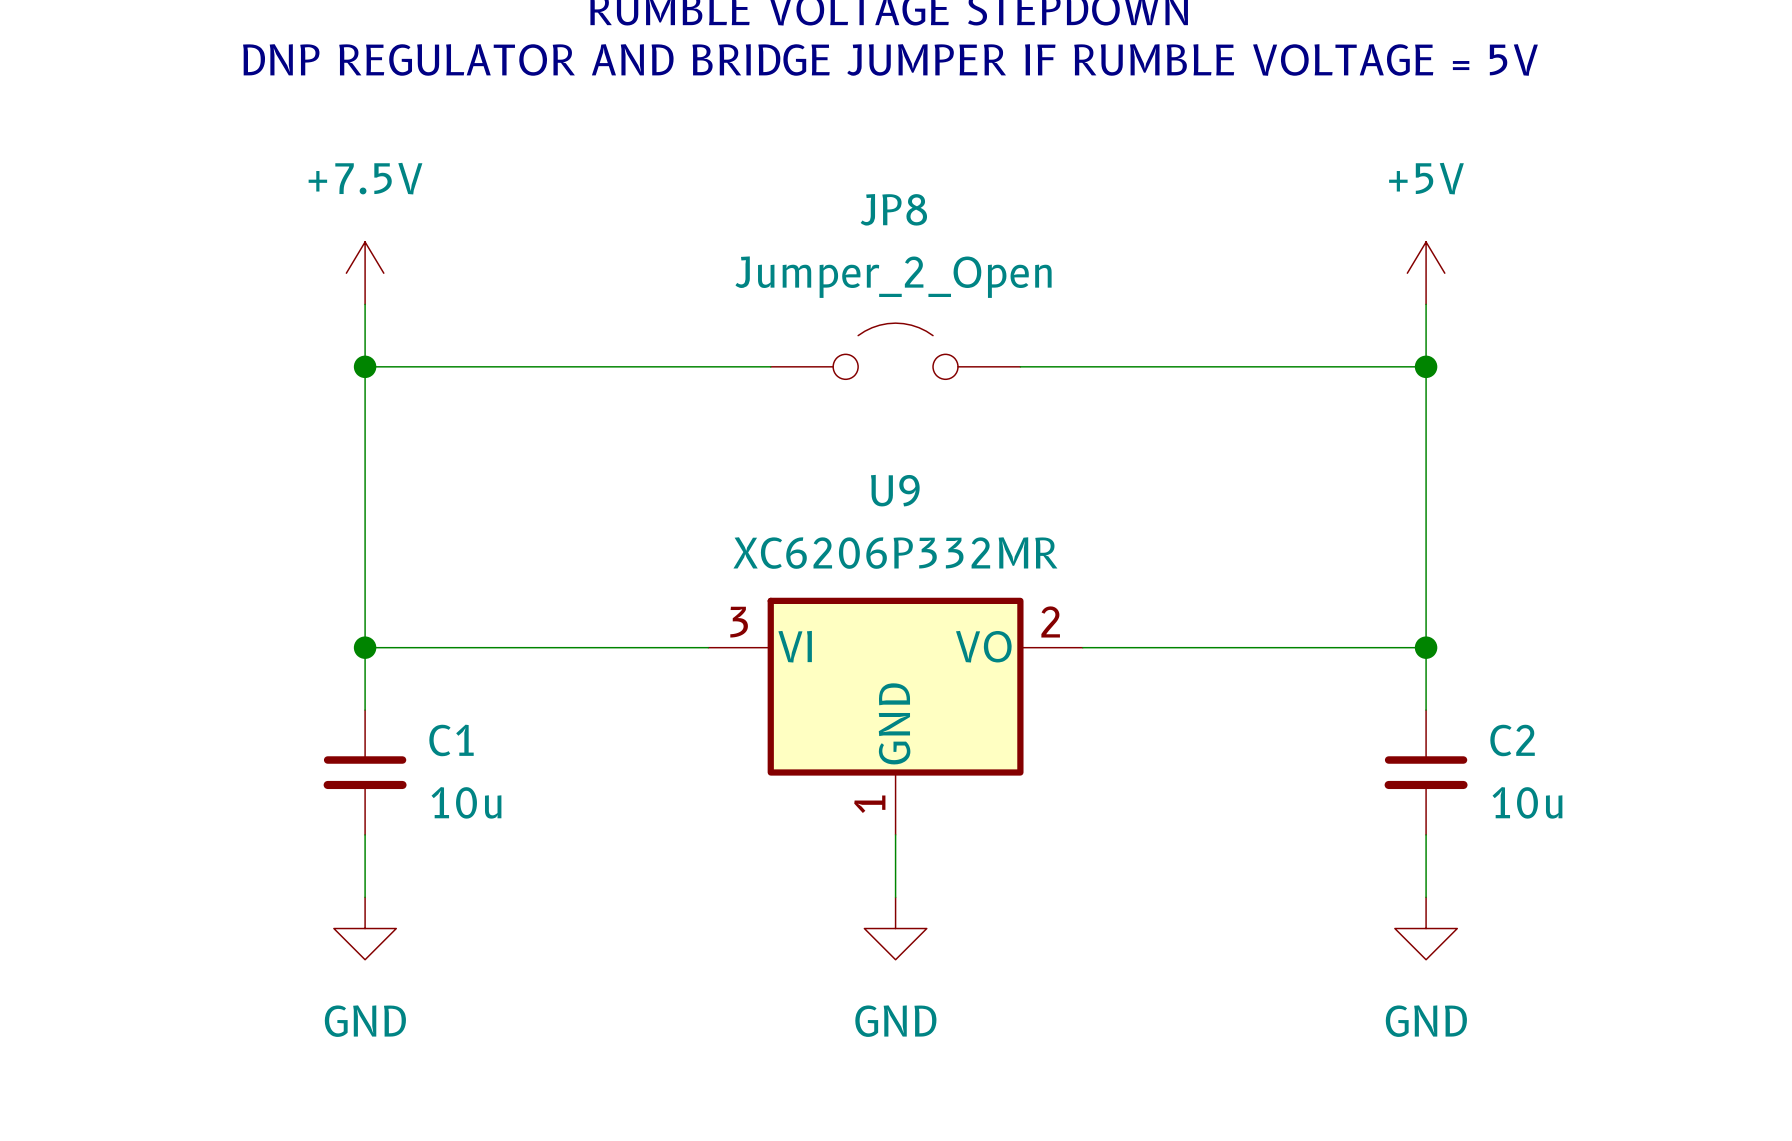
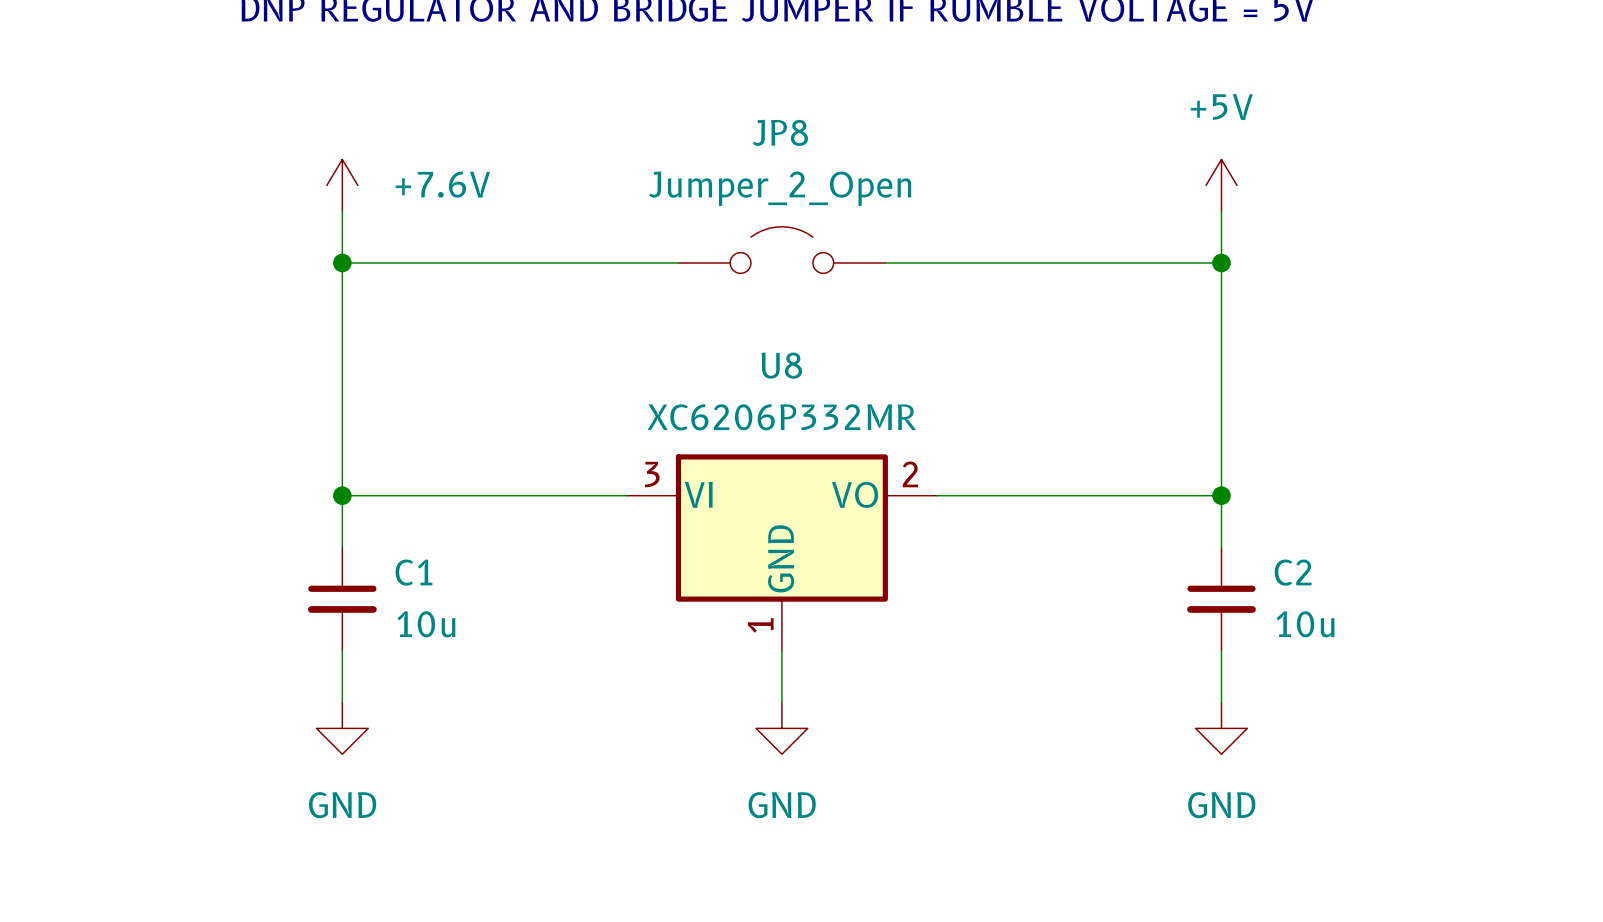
power symbol: +7.5V (365, 273) -> +7.6V (342, 185)
U9 name: U9 (895, 490) -> U8 (781, 365)

